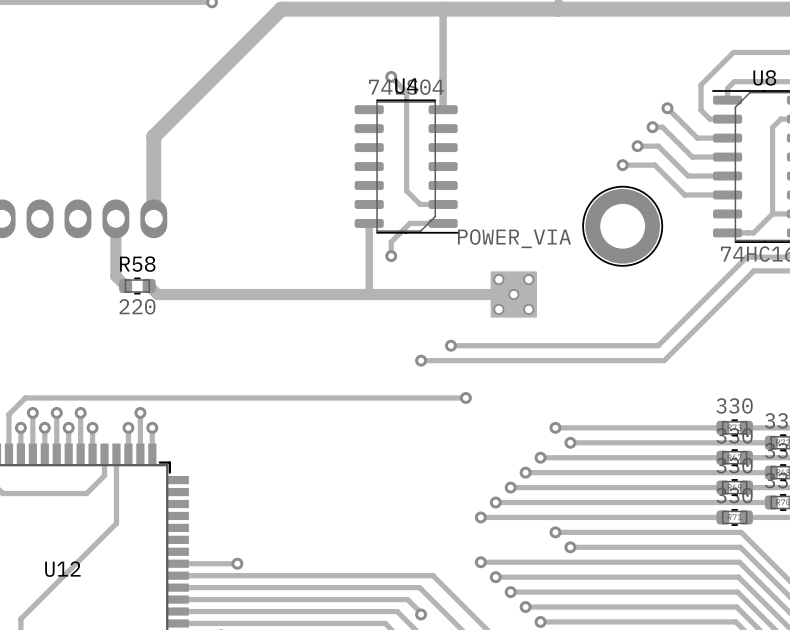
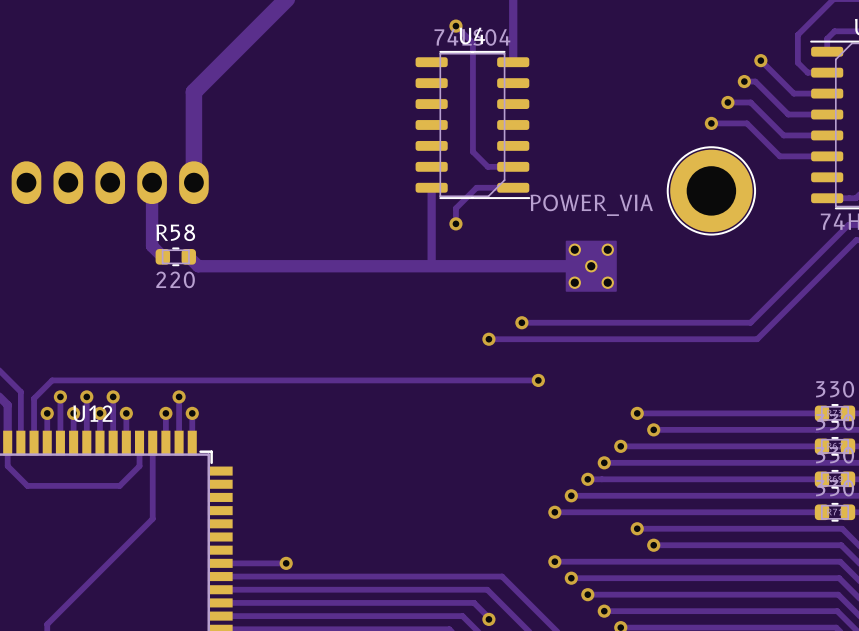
U12 name position: U12 (62, 569) -> U12 (92, 413)

